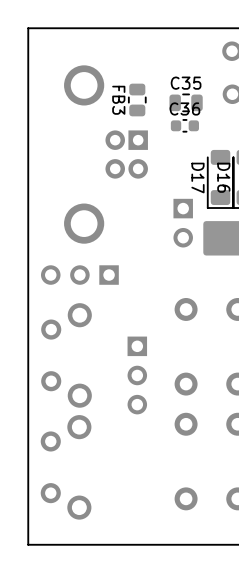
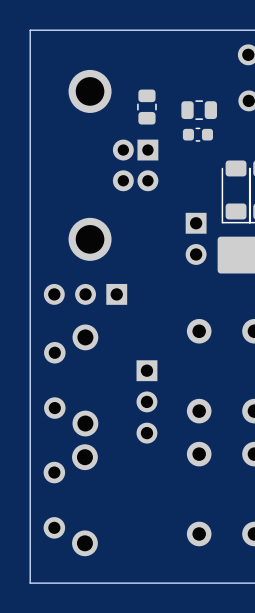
C35 name: C35 (186, 83) -> none
FB3 name: FB3 (118, 100) -> none
C36 name: C36 (184, 108) -> none
D16 name: D16 (223, 177) -> none
D17 name: D17 (197, 178) -> none

